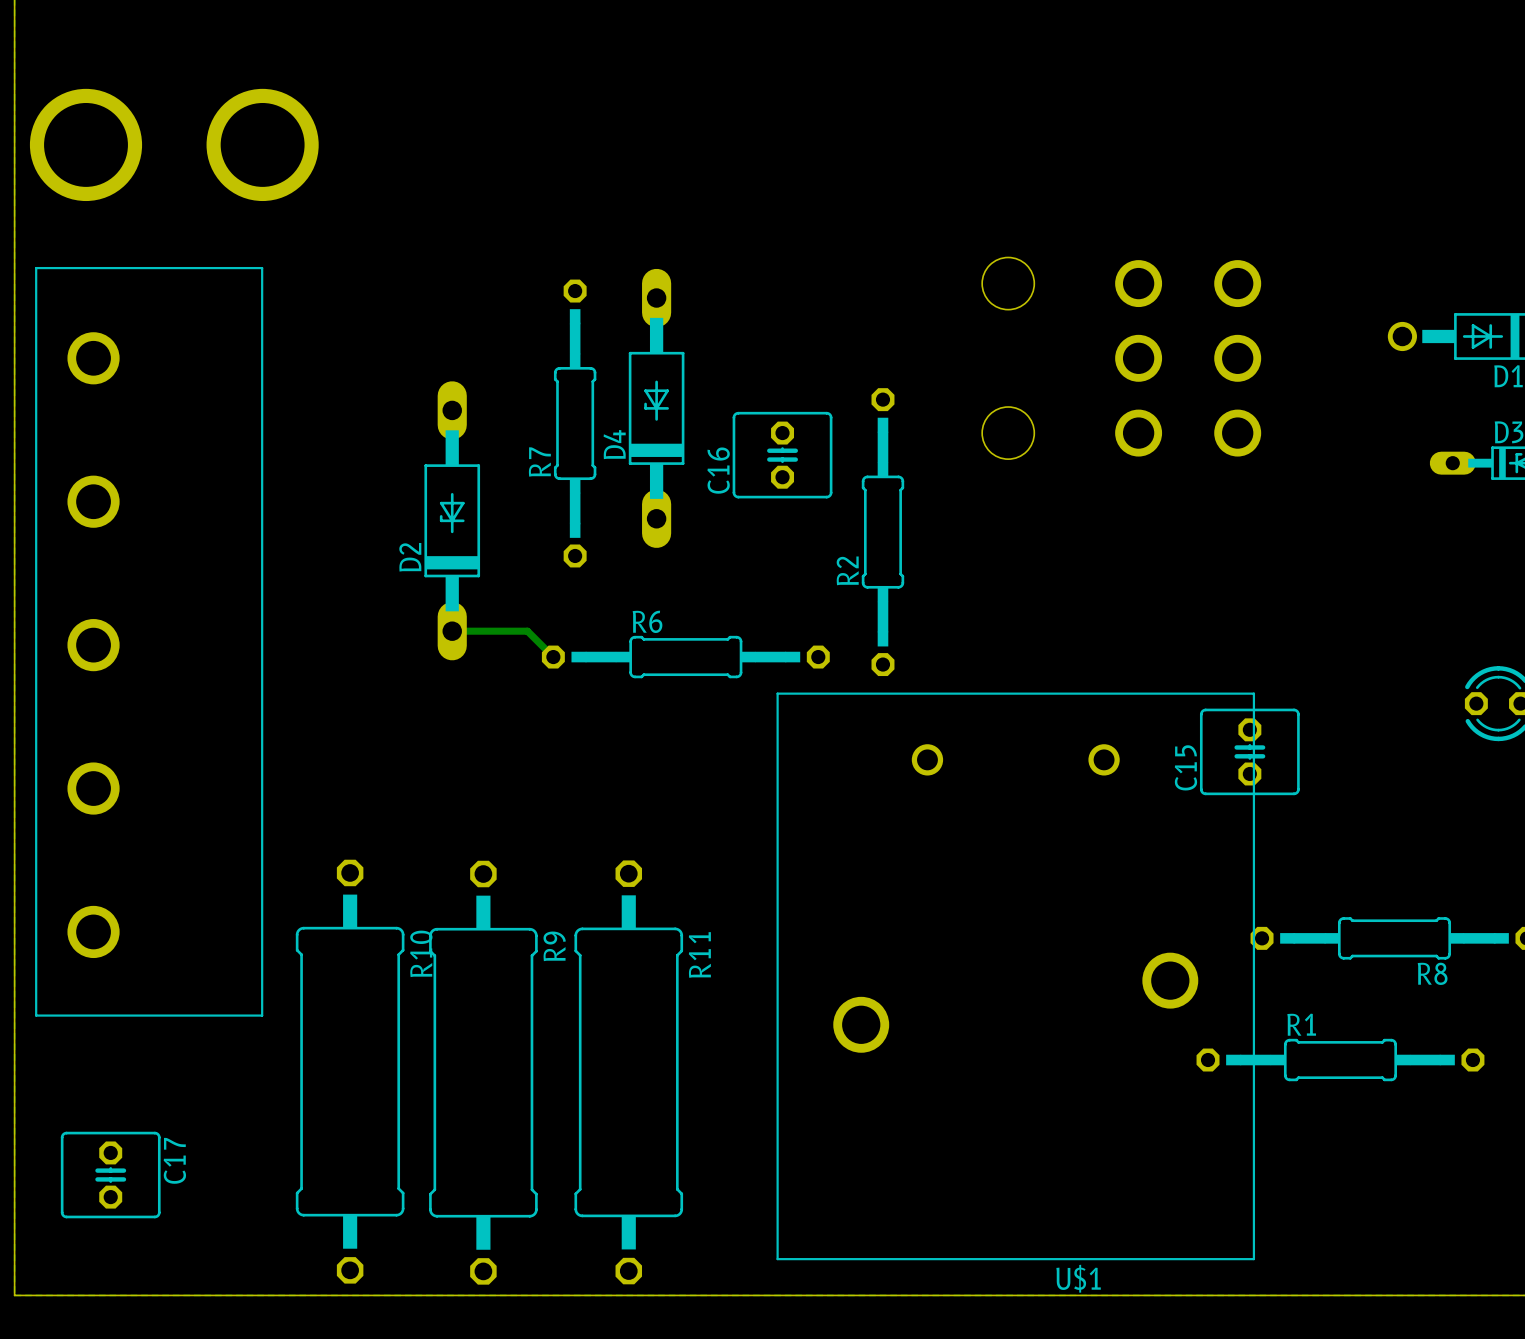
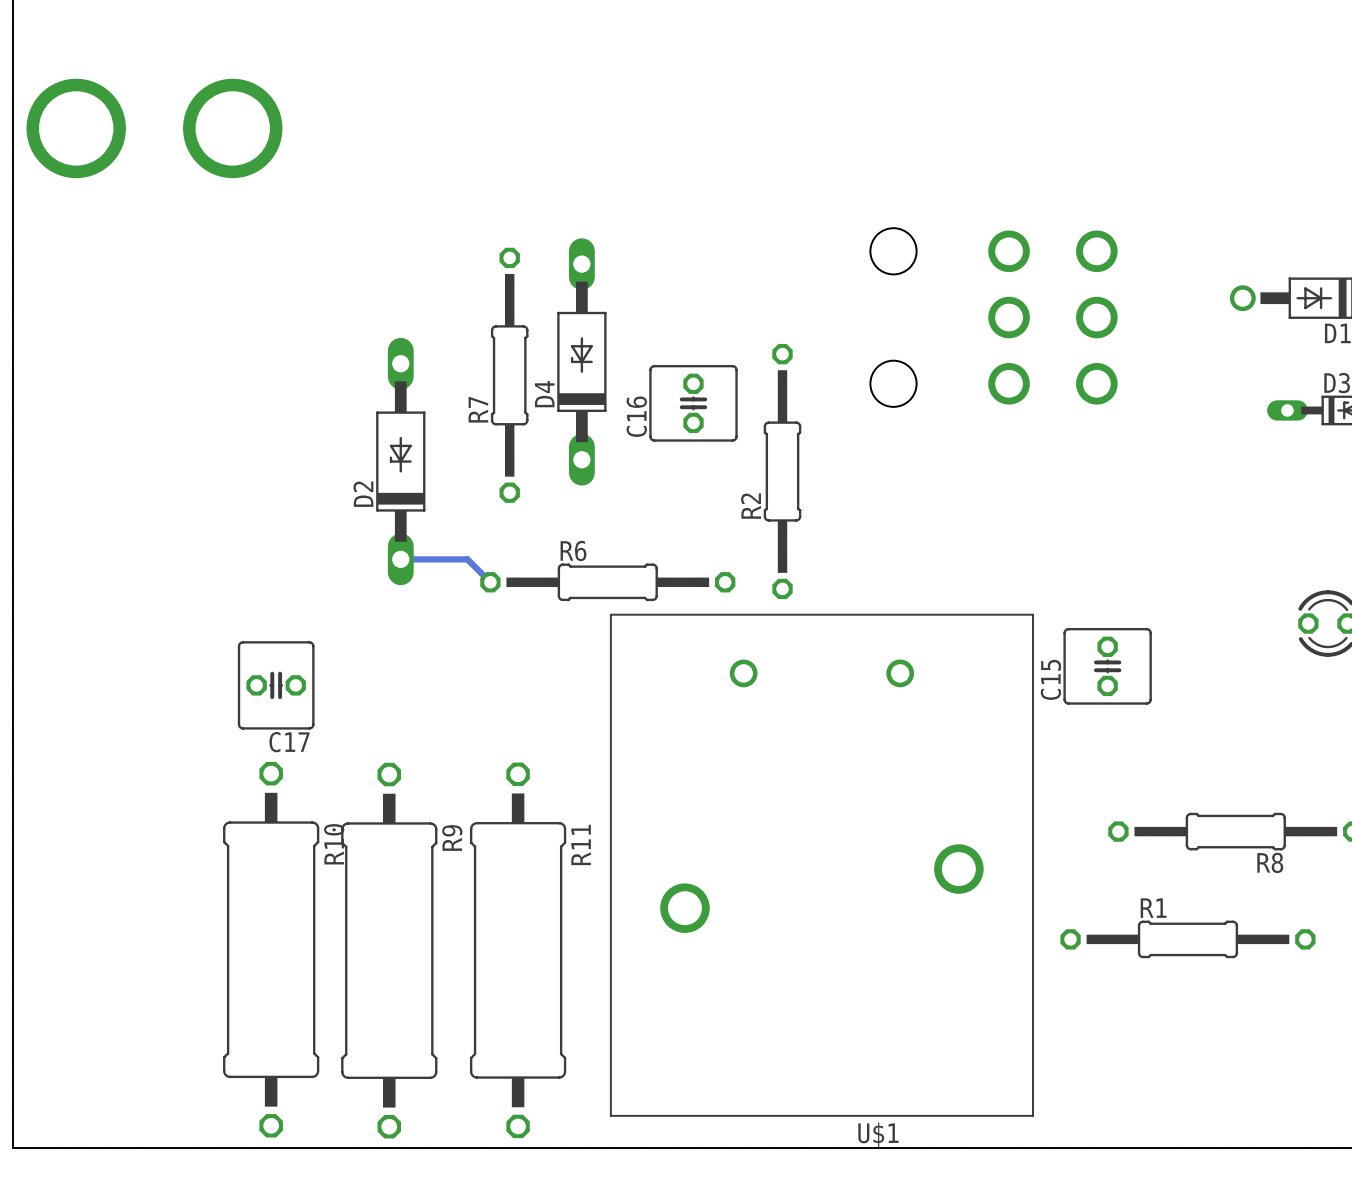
part: (149, 641) -> none
U$1 position: (1015, 976) -> (821, 865)
R10 position: (350, 1071) -> (271, 949)
R9 position: (483, 1072) -> (389, 950)
R11 position: (628, 1072) -> (518, 950)
C17 rotation: 0° (110, 1175) -> 90° clockwise (276, 685)
C17 position: (110, 1175) -> (276, 685)

